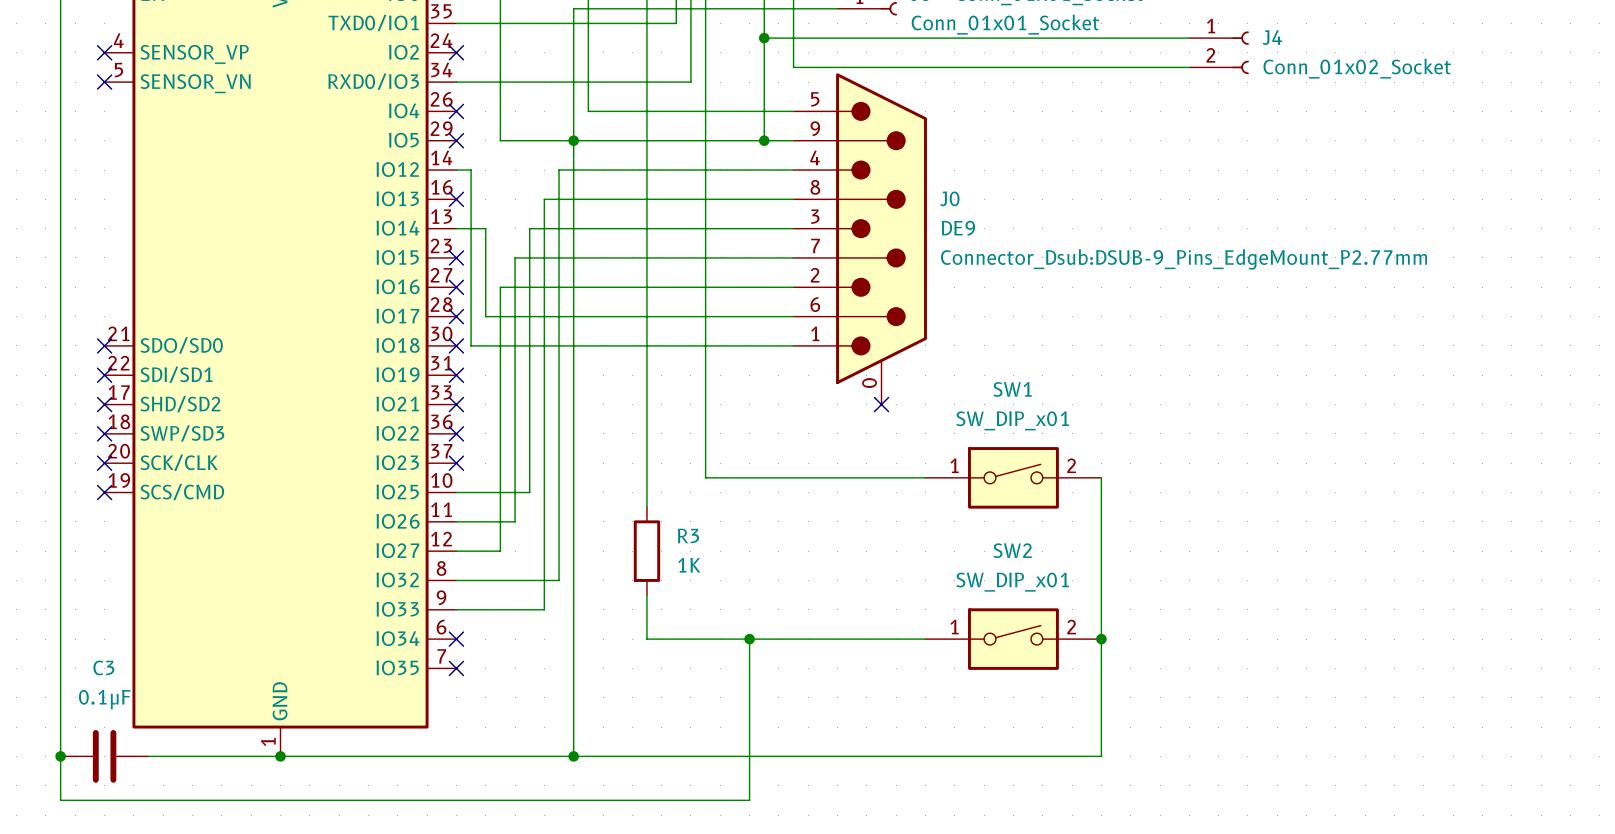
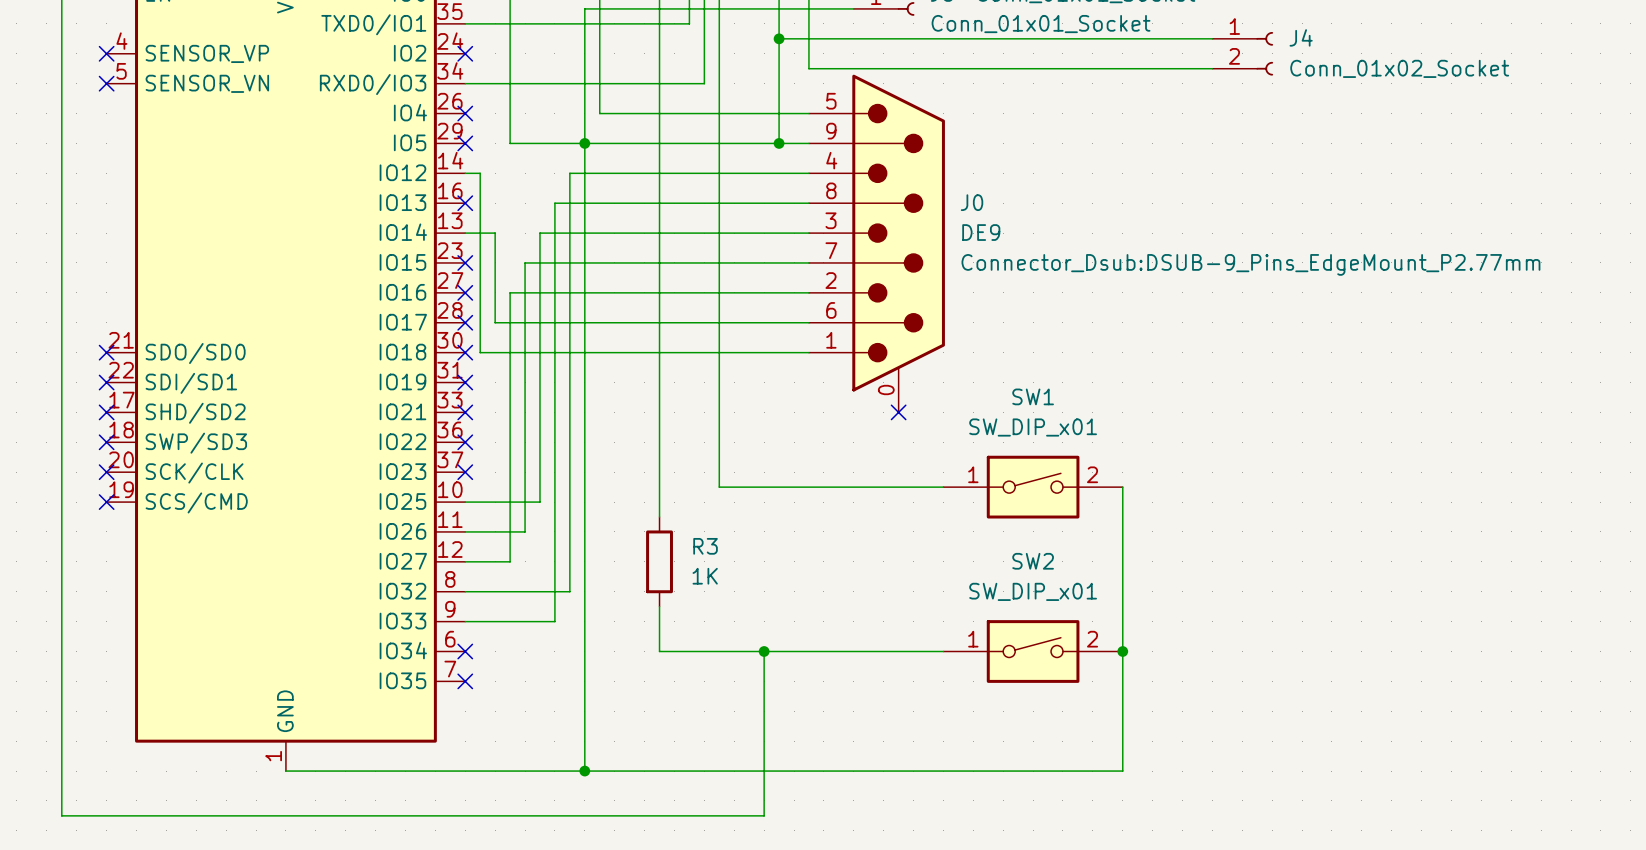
junction: (60, 756) -> none
C3: 0.1μF (104, 756) -> none
wire: (148, 756) (280, 756) -> none
junction: (280, 756) -> none

